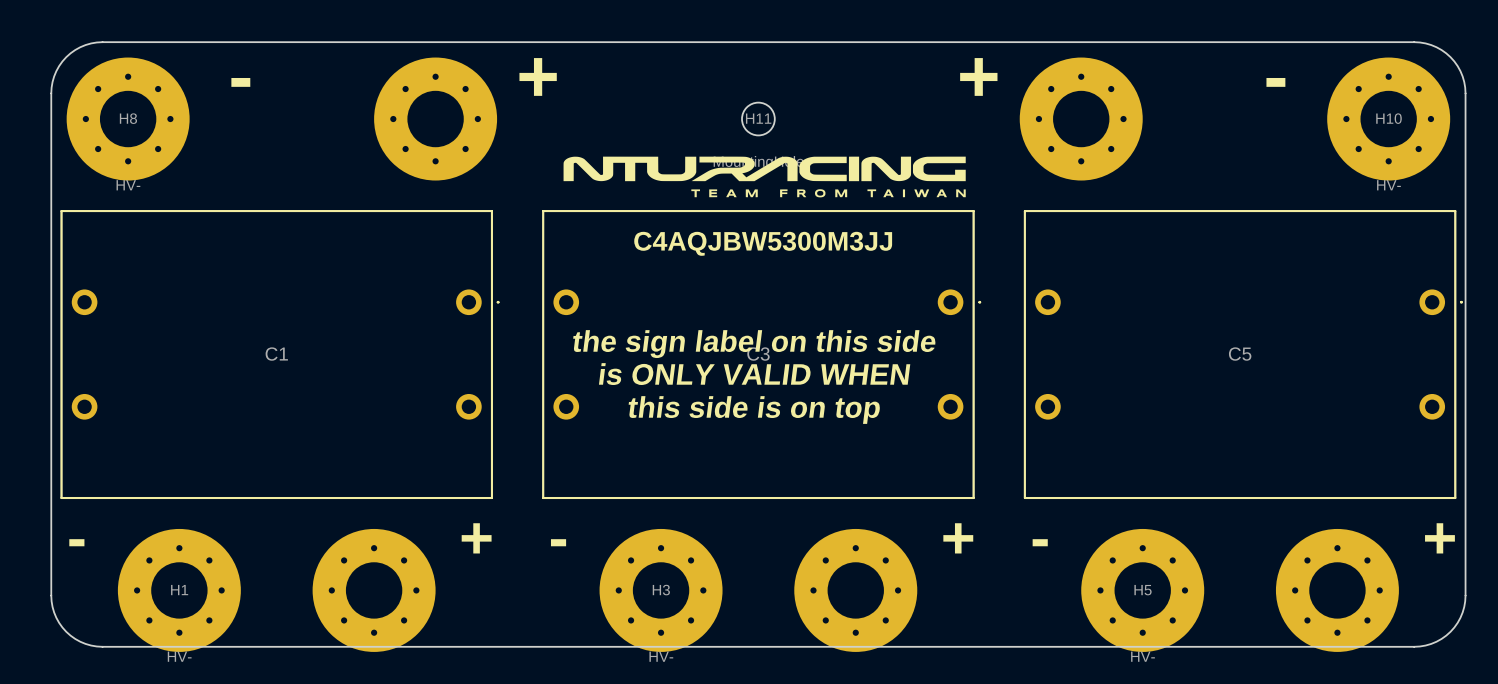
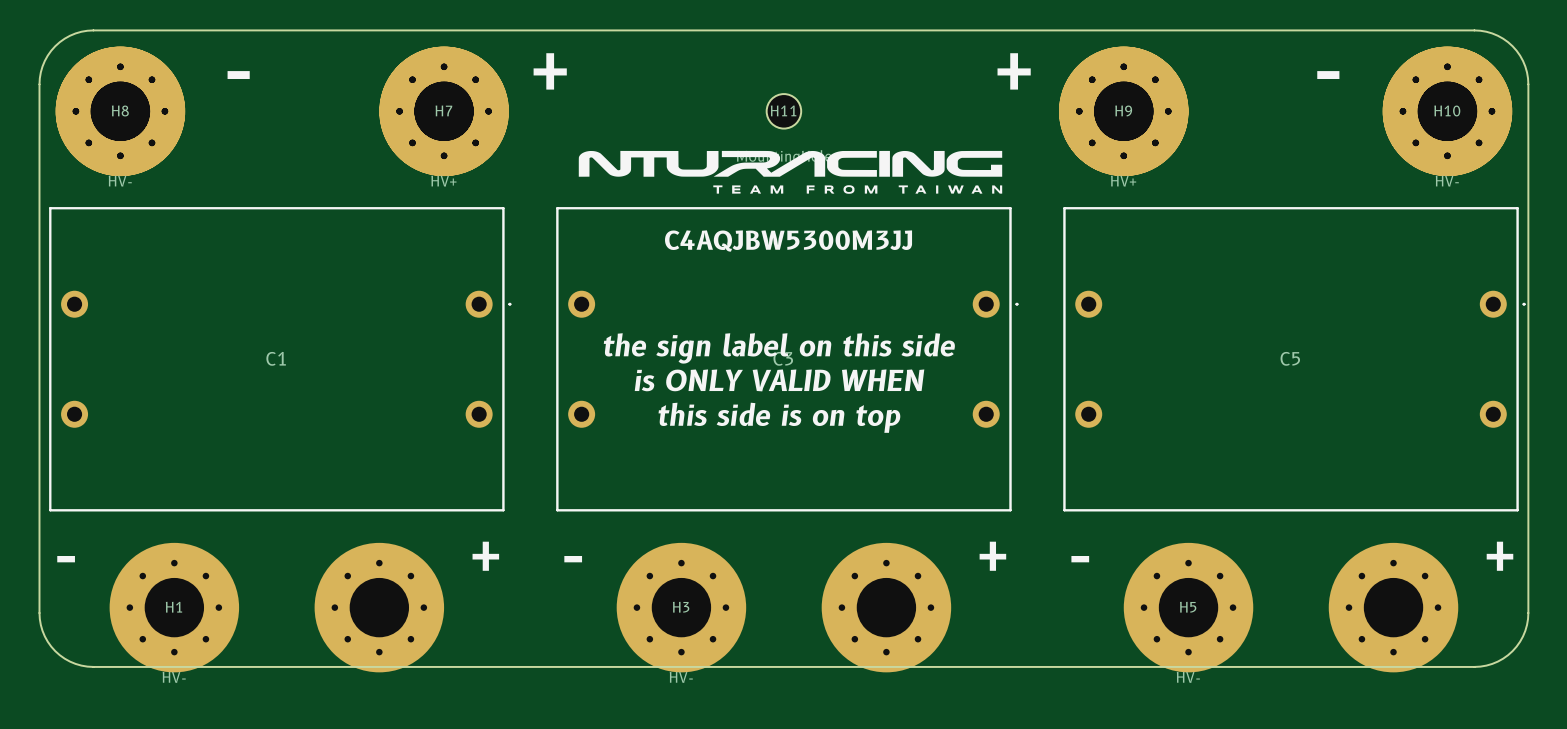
part: none -> (120, 111)
H7: none -> HV+ (444, 111)
H9: none -> HV+ (1123, 111)
part: none -> (1447, 111)

